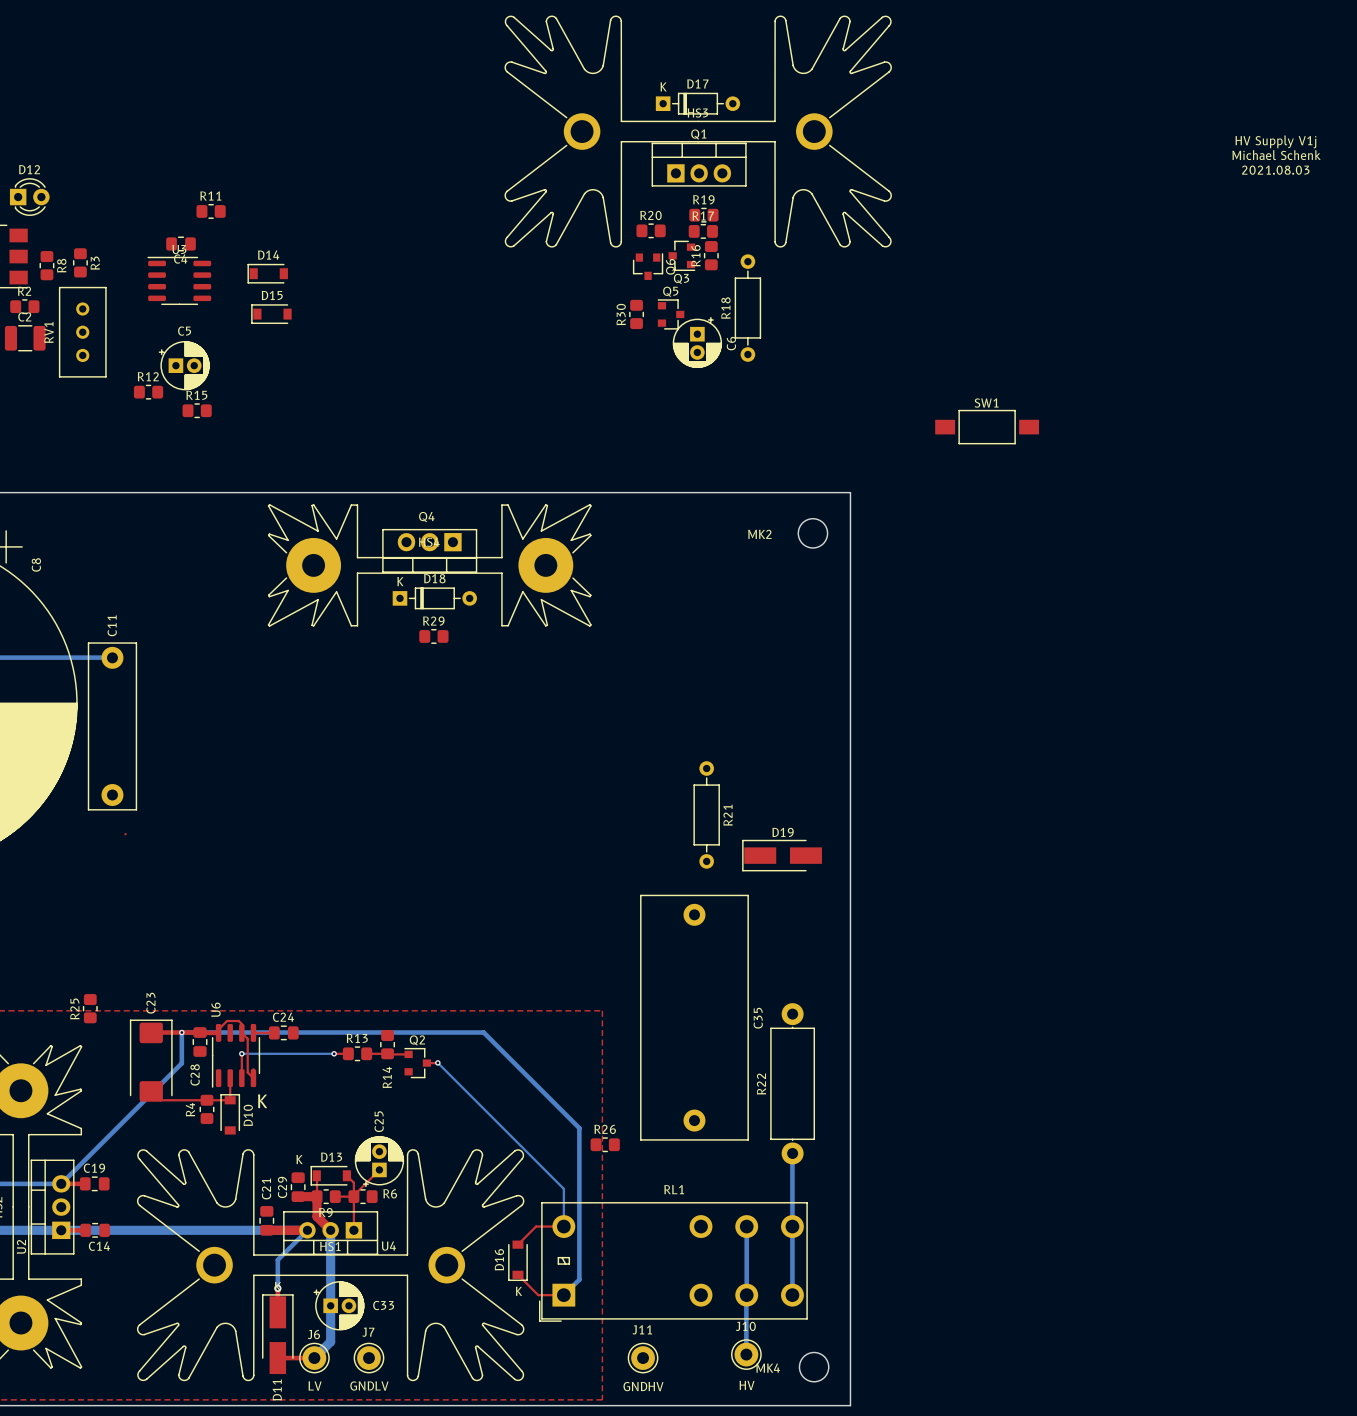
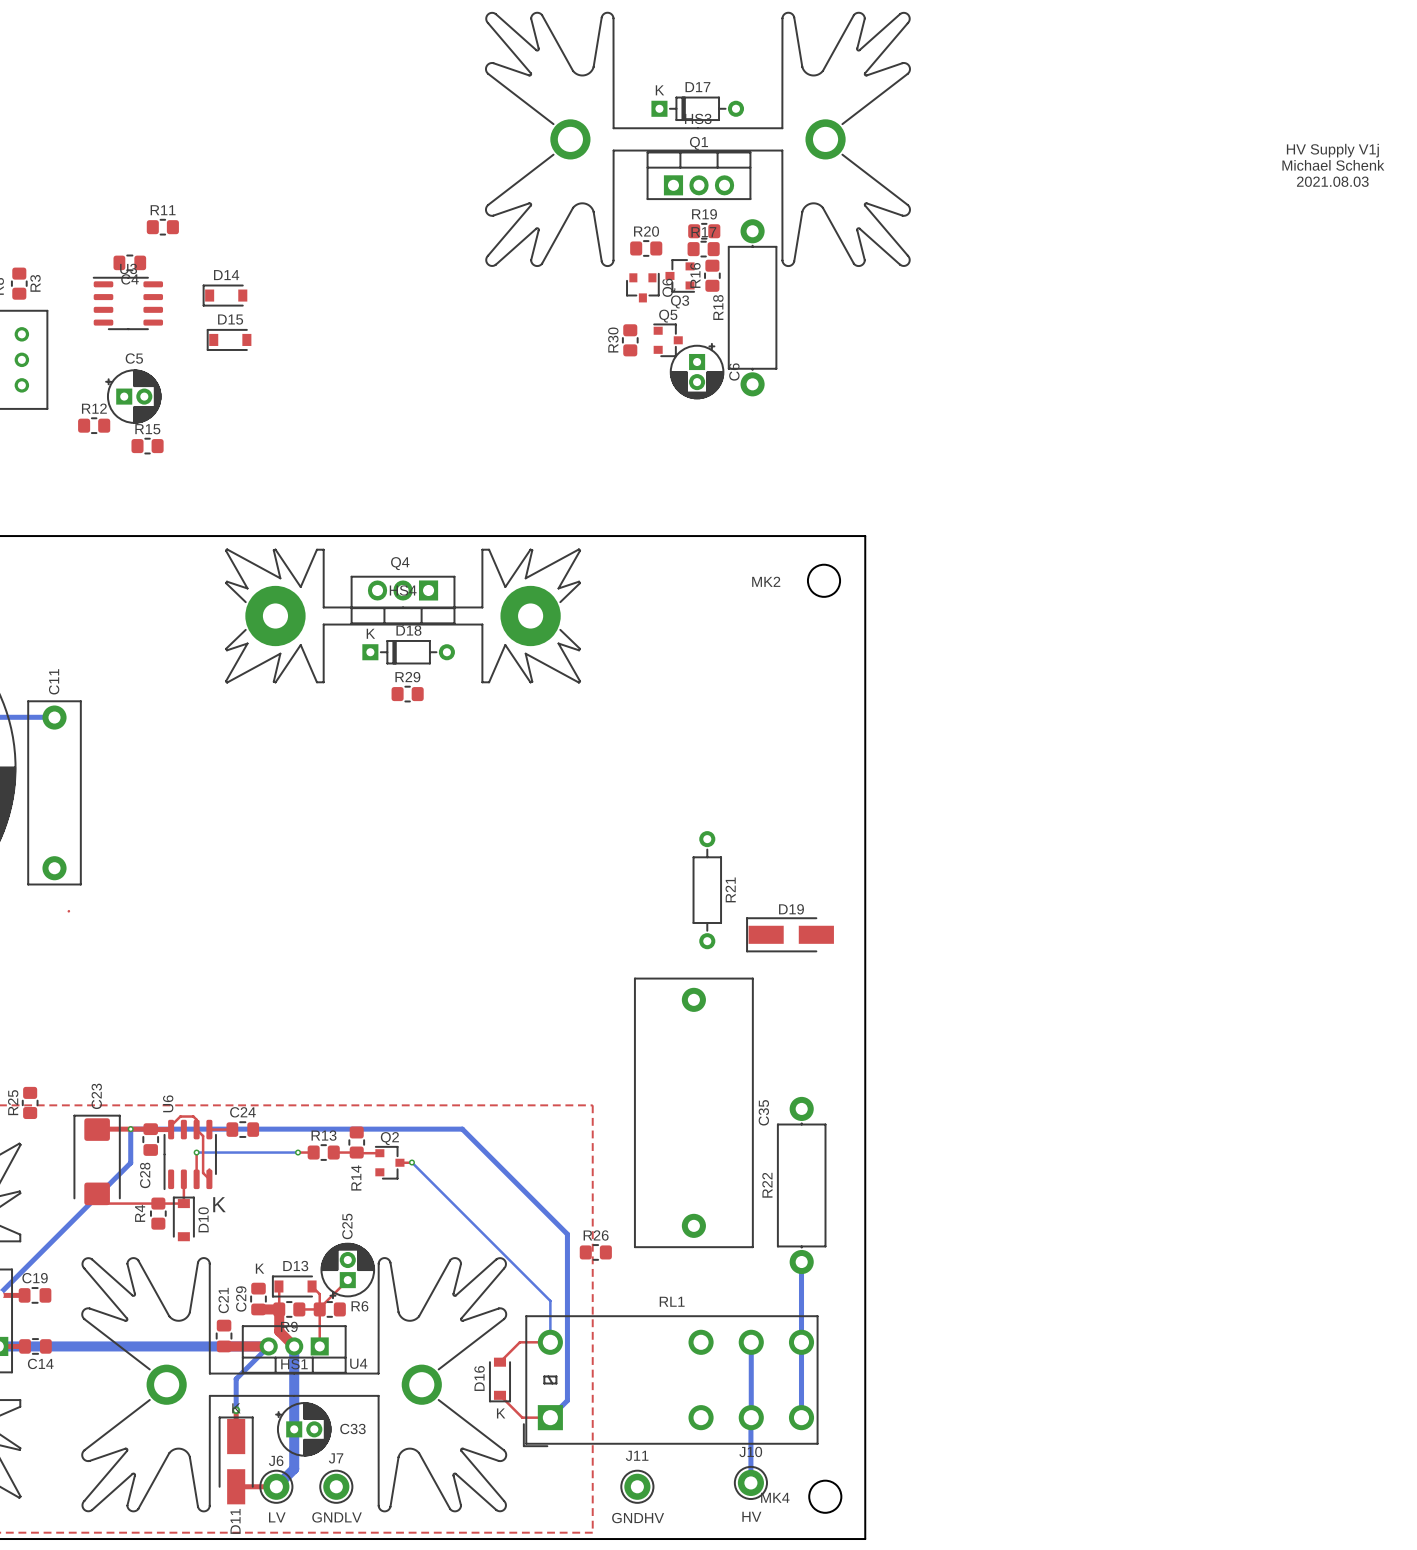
R18 footprint: [734, 254, 761, 362] -> [728, 219, 777, 397]
SW1: (987, 427) -> none

